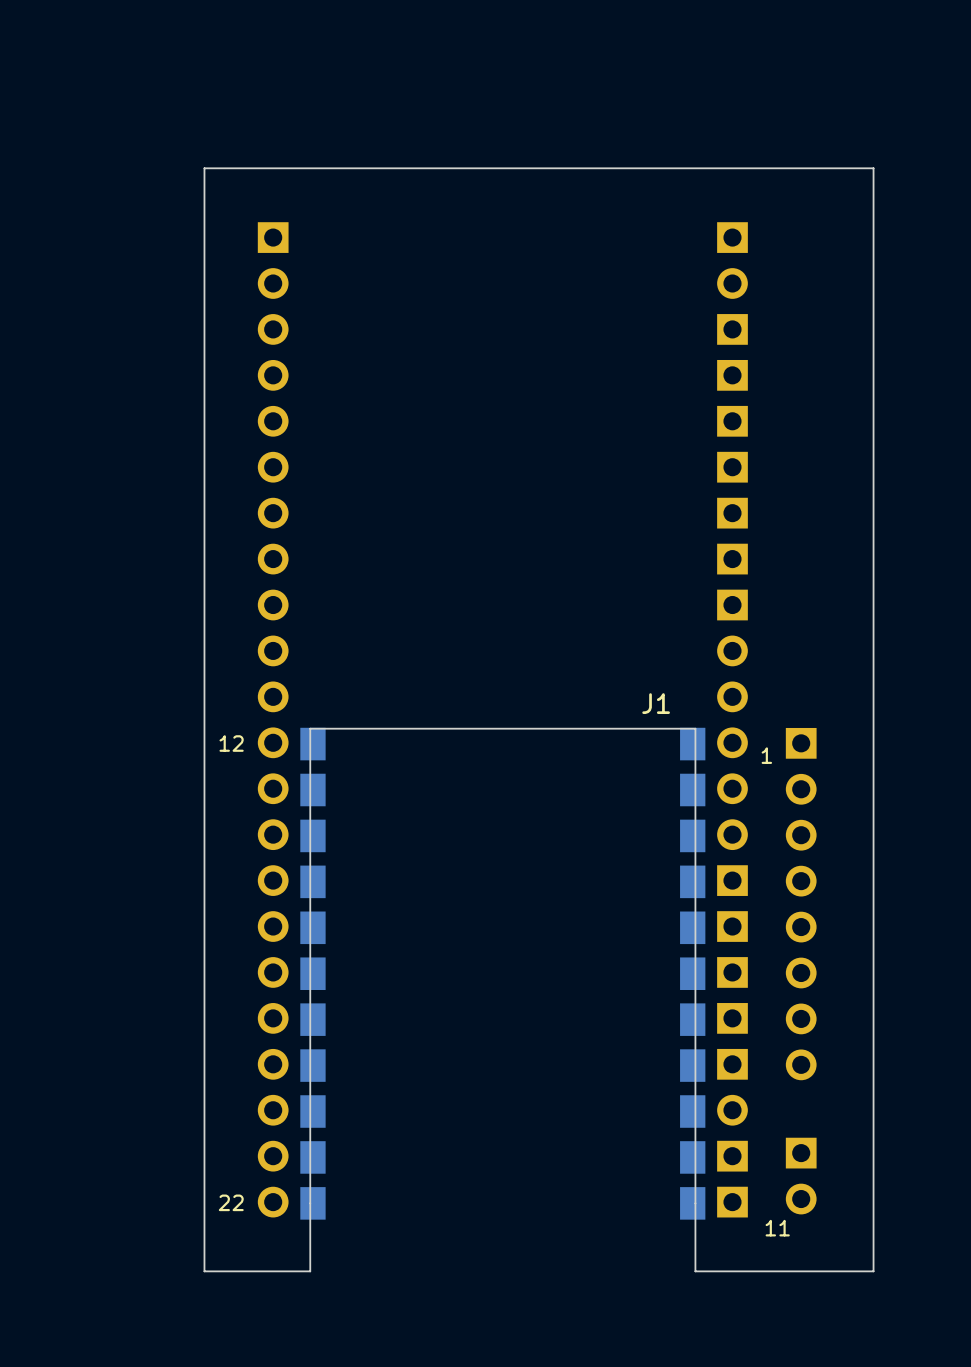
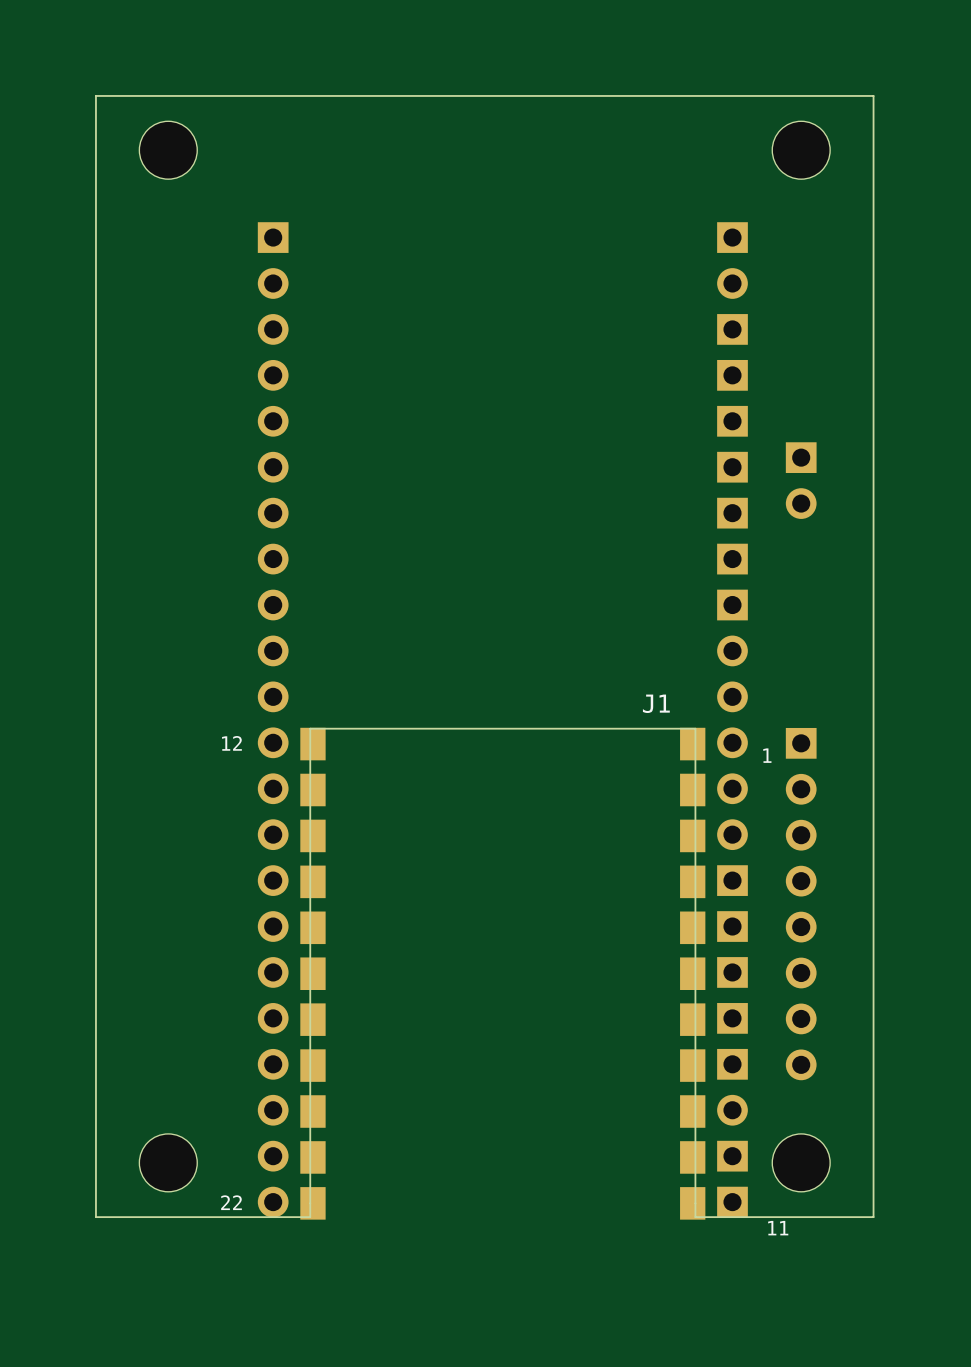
part: none -> (168, 150)
part: none -> (801, 150)
board edge: (873, 168) (204, 168) (204, 1271) (310, 1271) (310, 1217) -> (873, 168) (873, 95) (95, 95) (95, 1217) (310, 1217)
part: none -> (801, 480)
part footprint: [785, 1137, 817, 1215] -> [772, 1133, 831, 1192]
part: none -> (168, 1162)
board edge: (873, 1217) (873, 1271) (695, 1271) (695, 1217) -> (873, 1217) (695, 1217)

